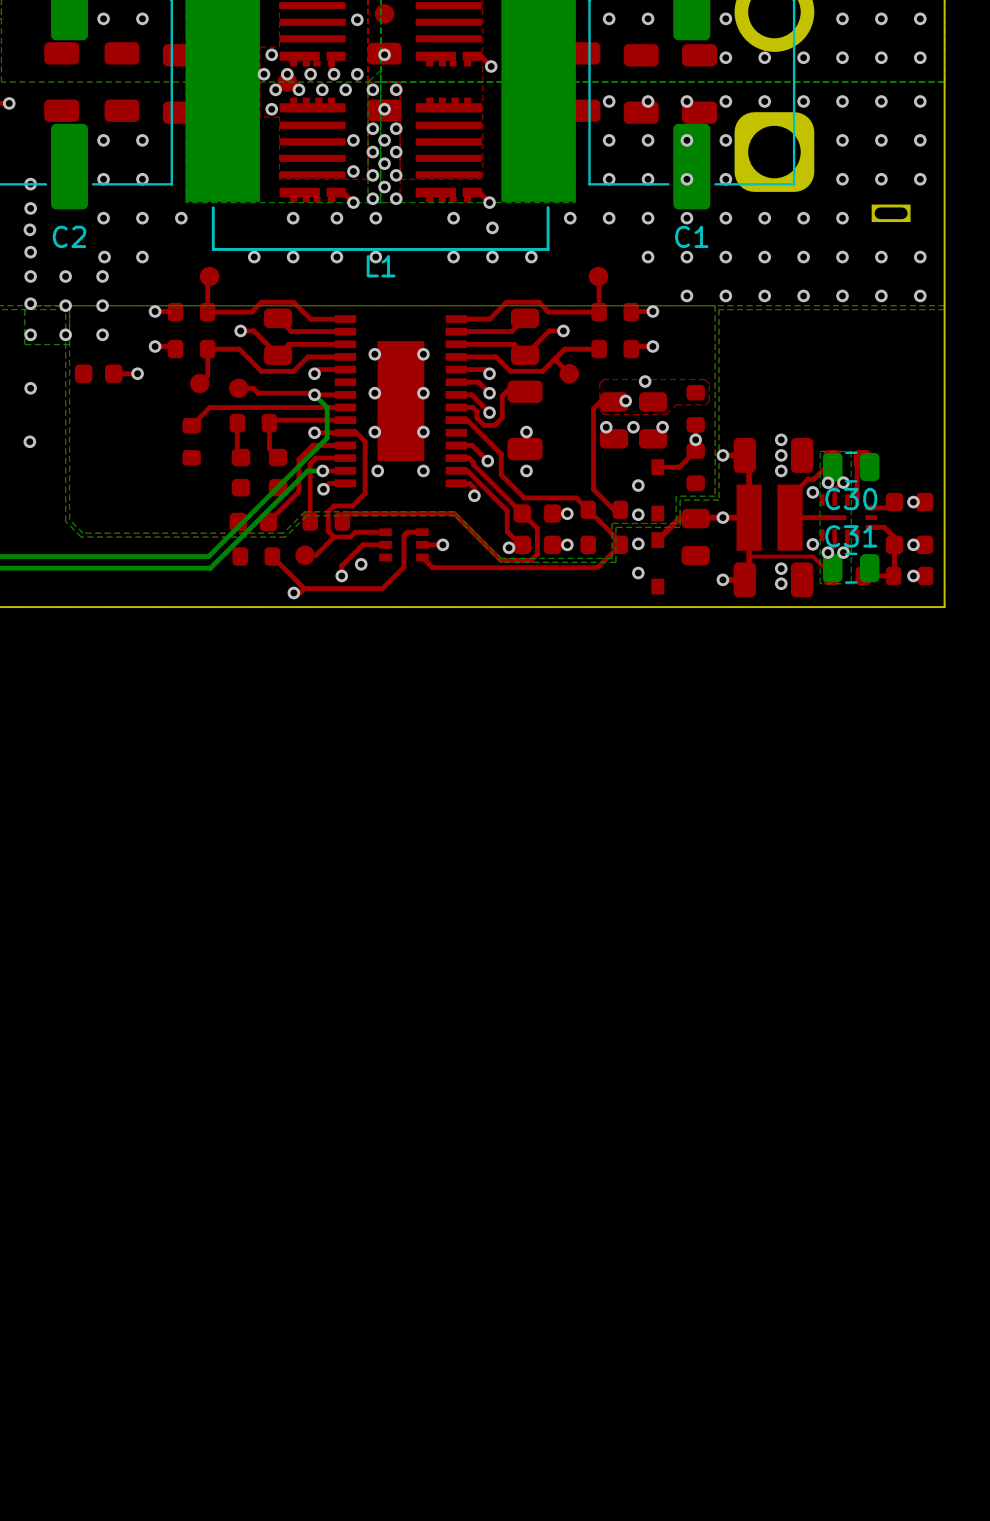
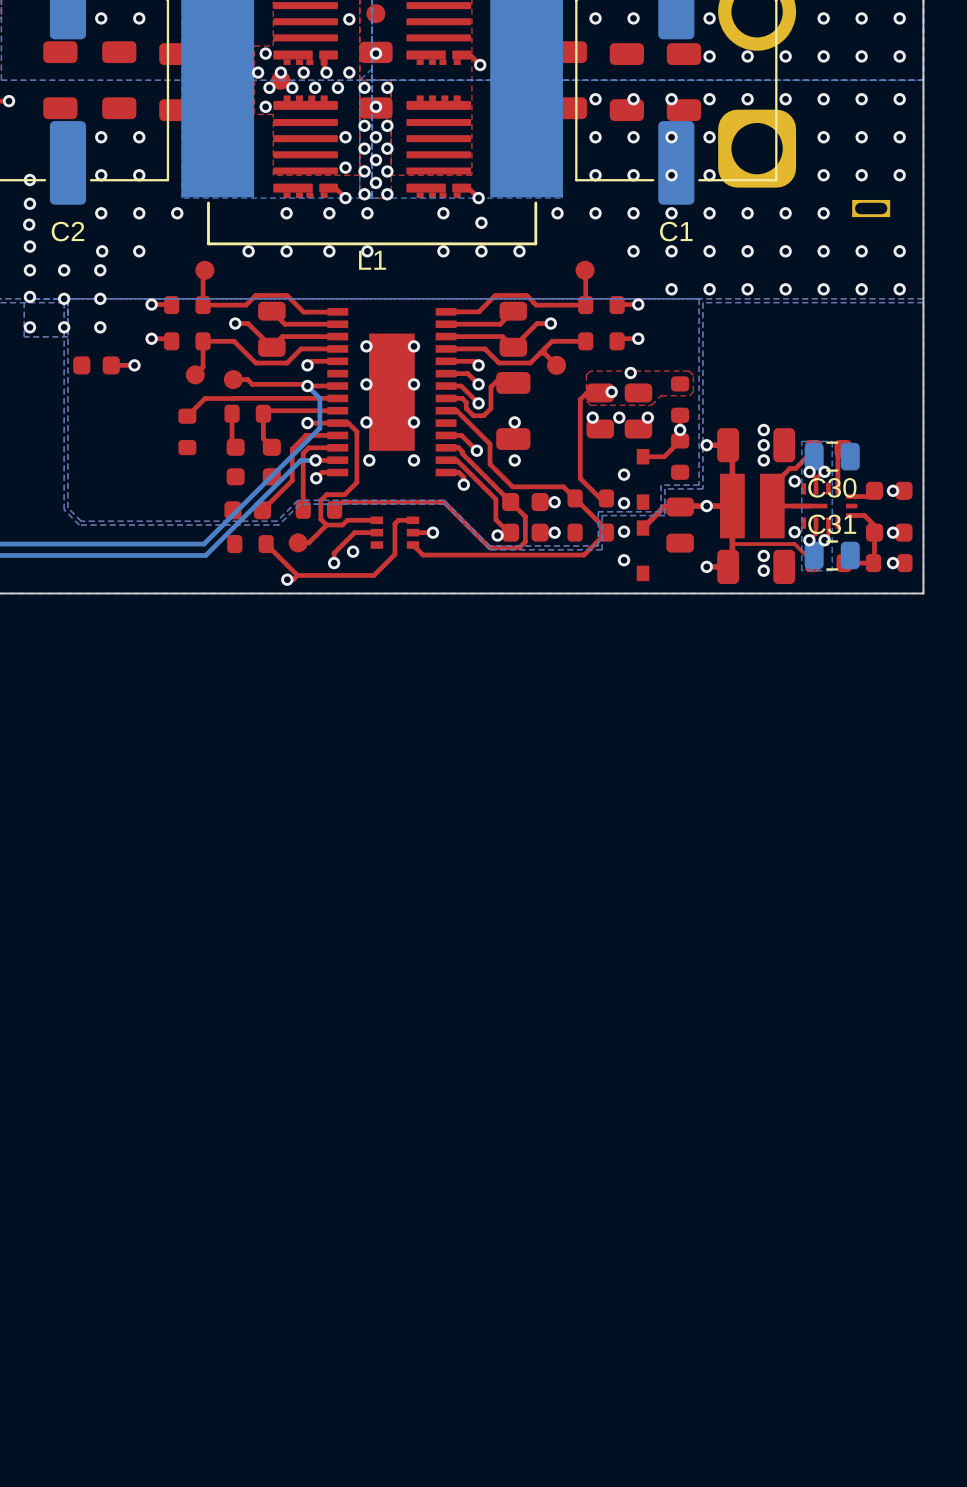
via: (30, 388) -> none
via: (29, 441) -> none

